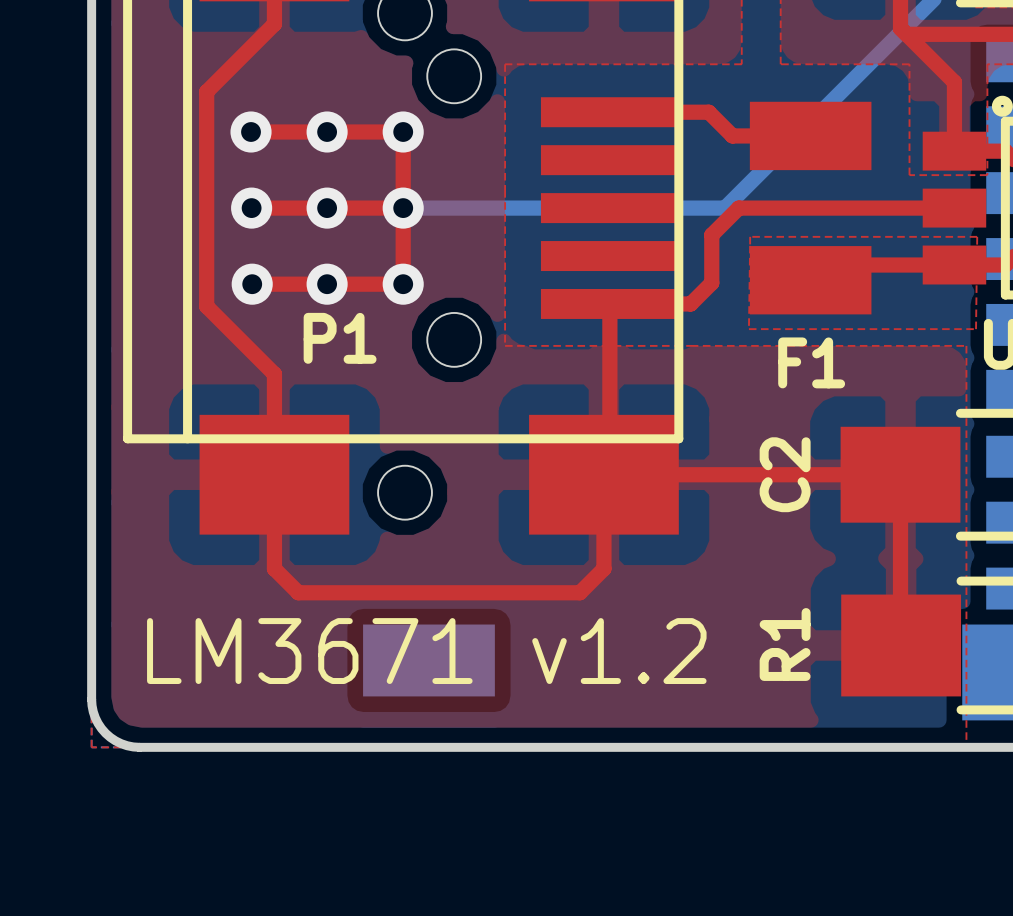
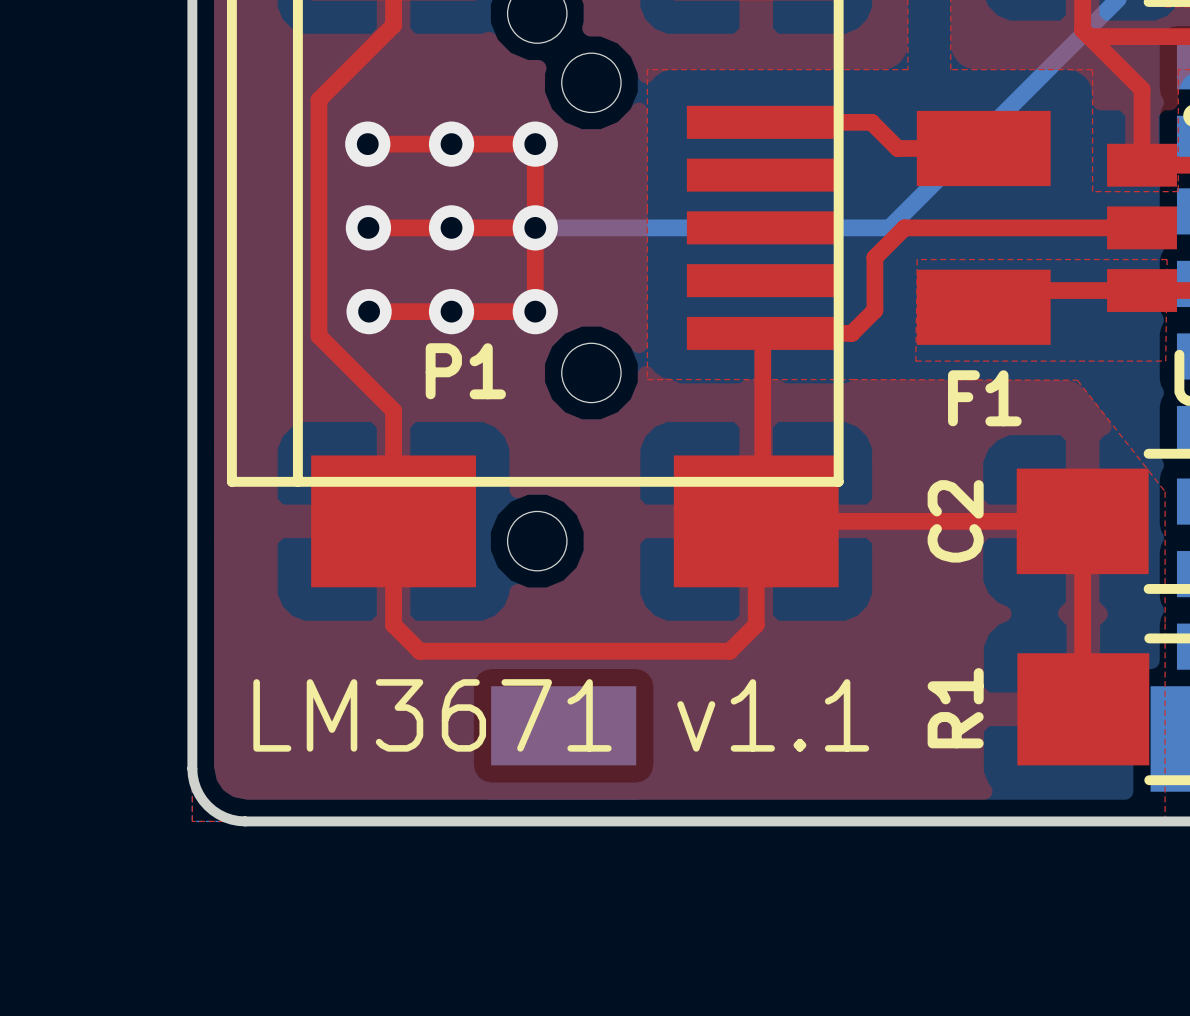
top zone outline: (690, 345) (966, 345) (966, 747) -> (851, 379) (1077, 380) (1165, 491) (1165, 821) (1155, 821)
text: LM3671 v1.2 (426, 651) -> LM3671 v1.1 (561, 715)

